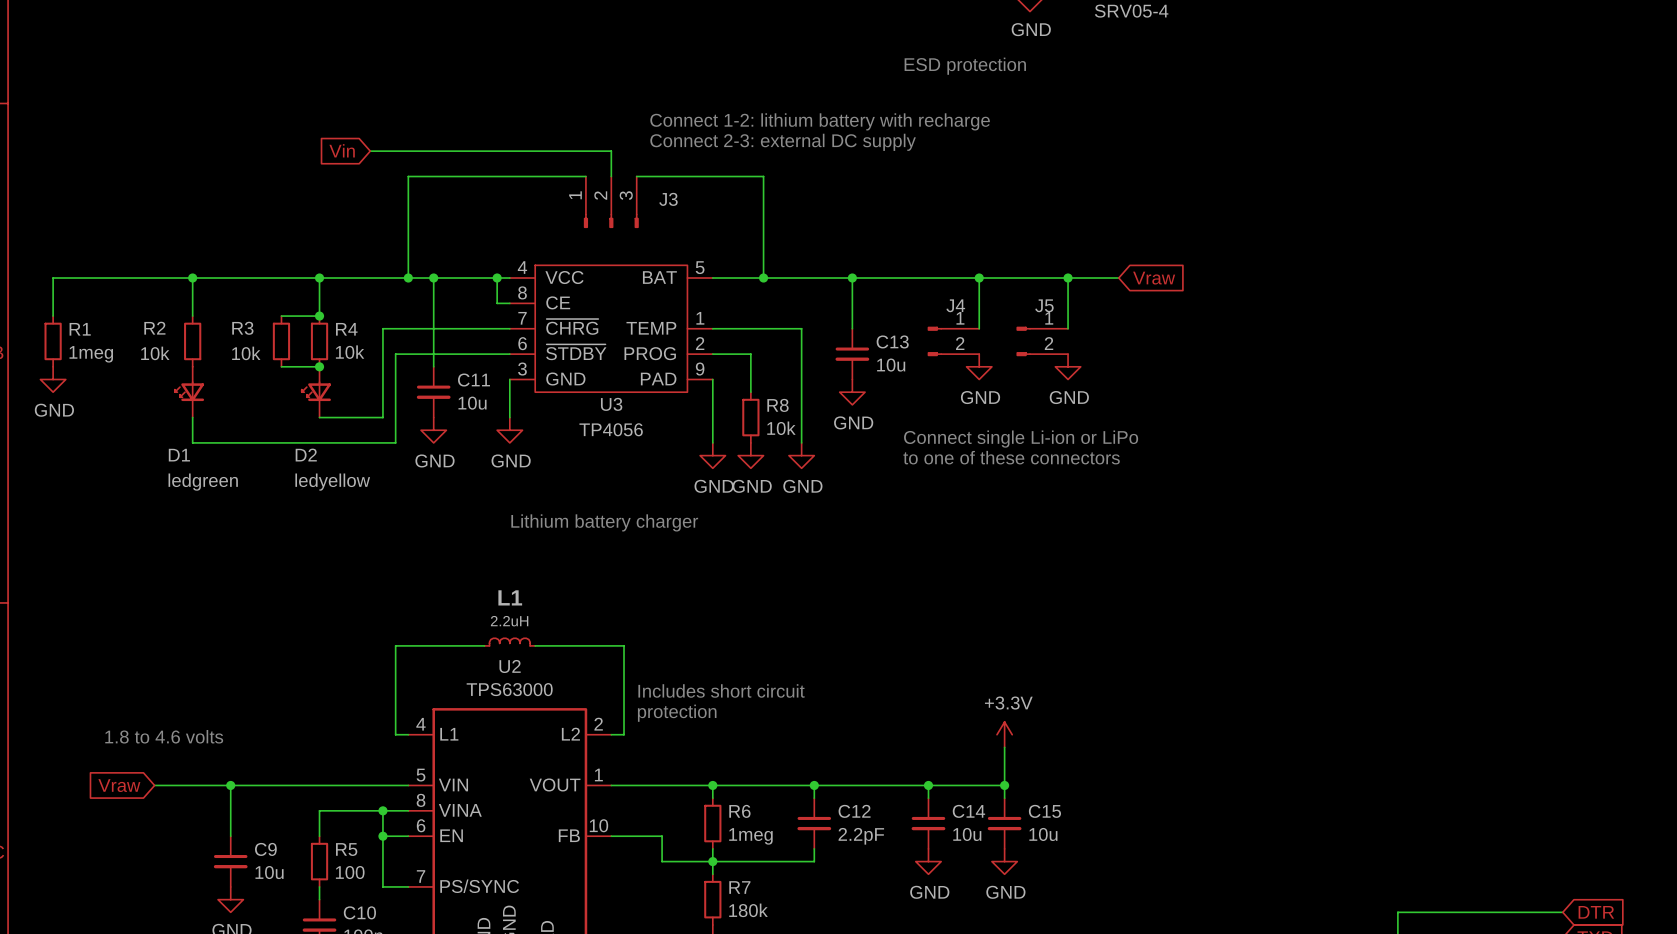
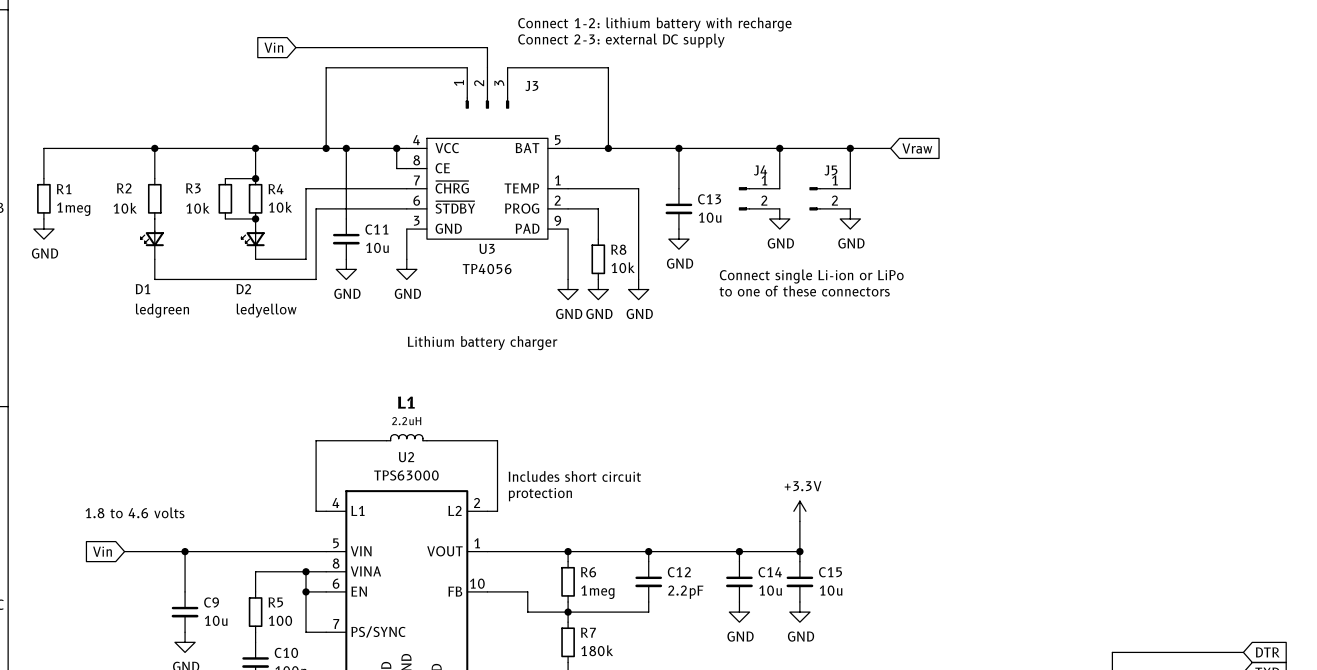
global label: Vraw (119, 785) -> Vin (102, 551)

